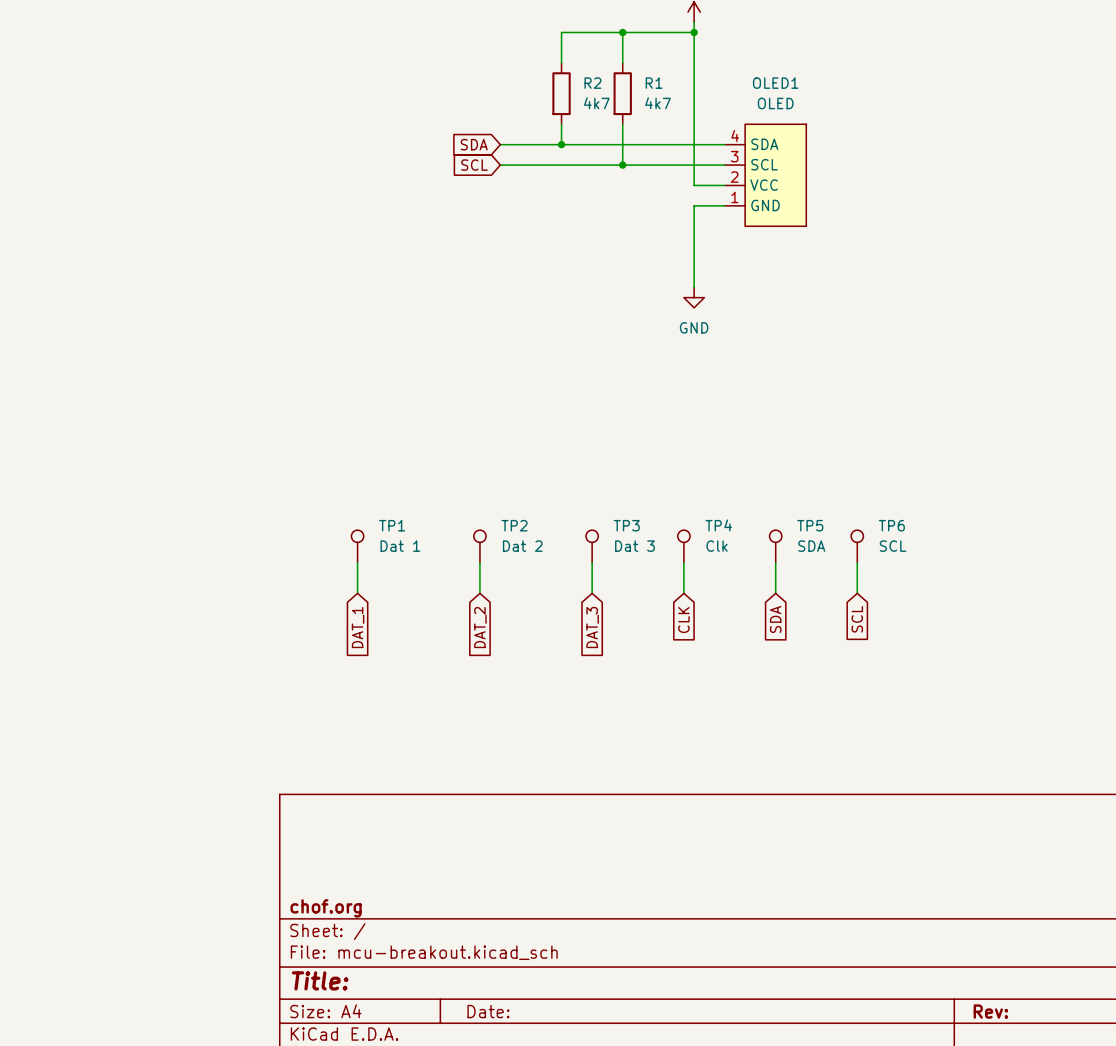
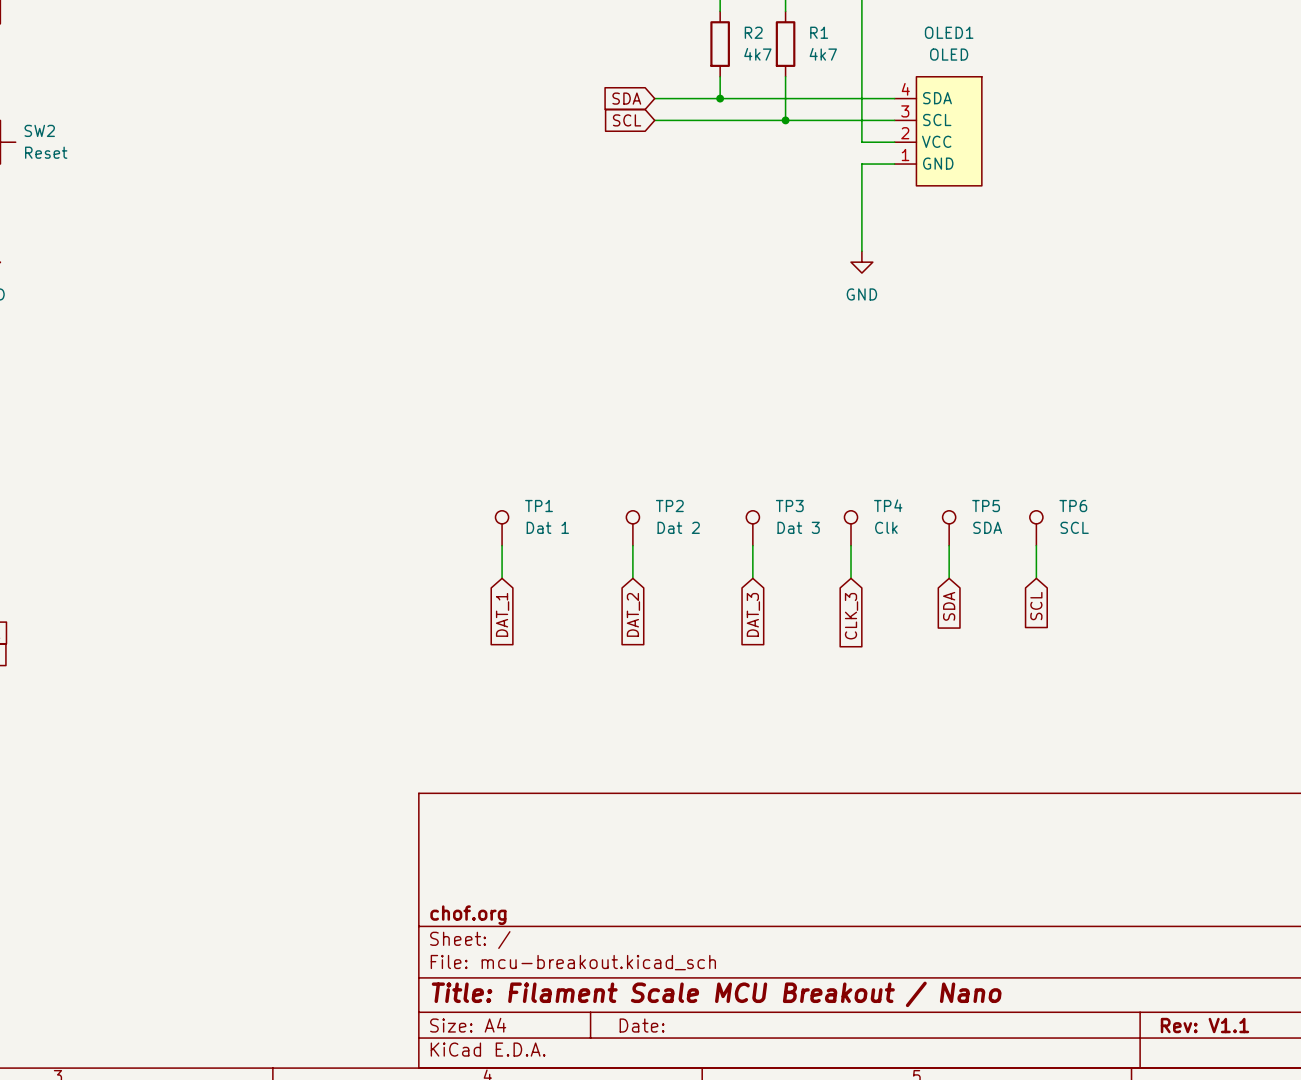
global label: CLK (683, 620) -> CLK_3 (851, 616)
title block: Title: (320, 980) -> Title: Filament Scale MCU Breakout / Nano (716, 994)
title block: Rev: (990, 1011) -> Rev: V1.1 (1204, 1025)

